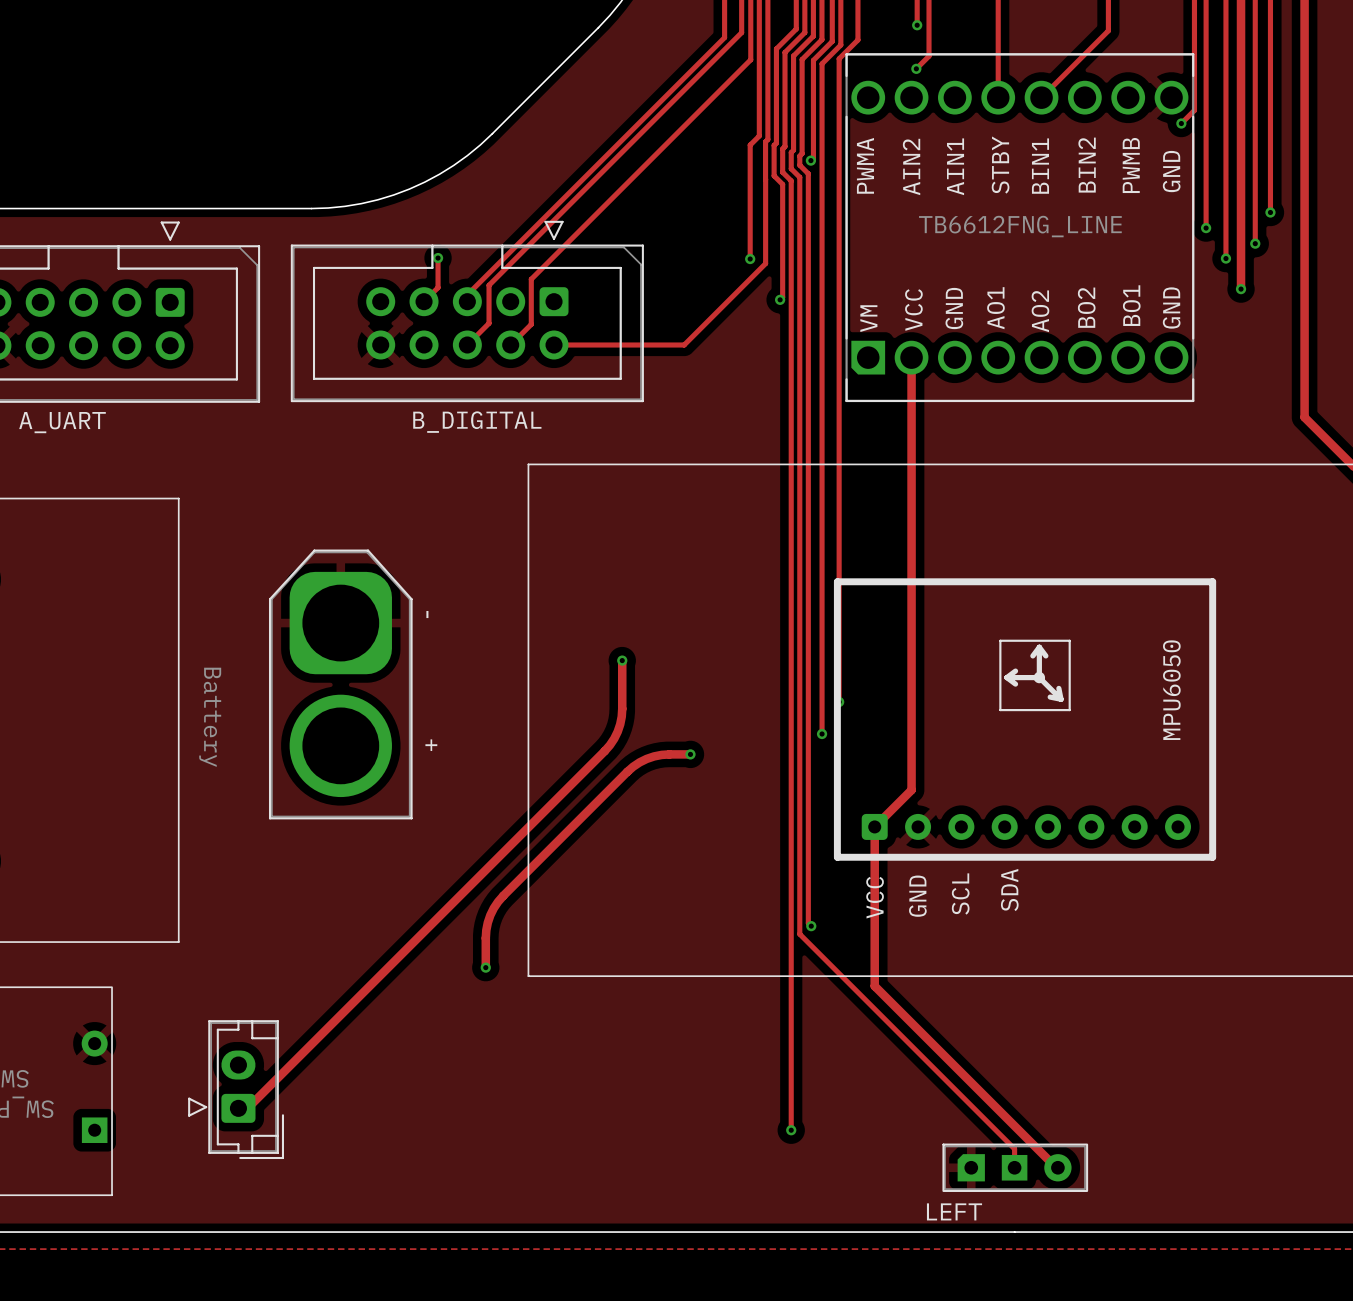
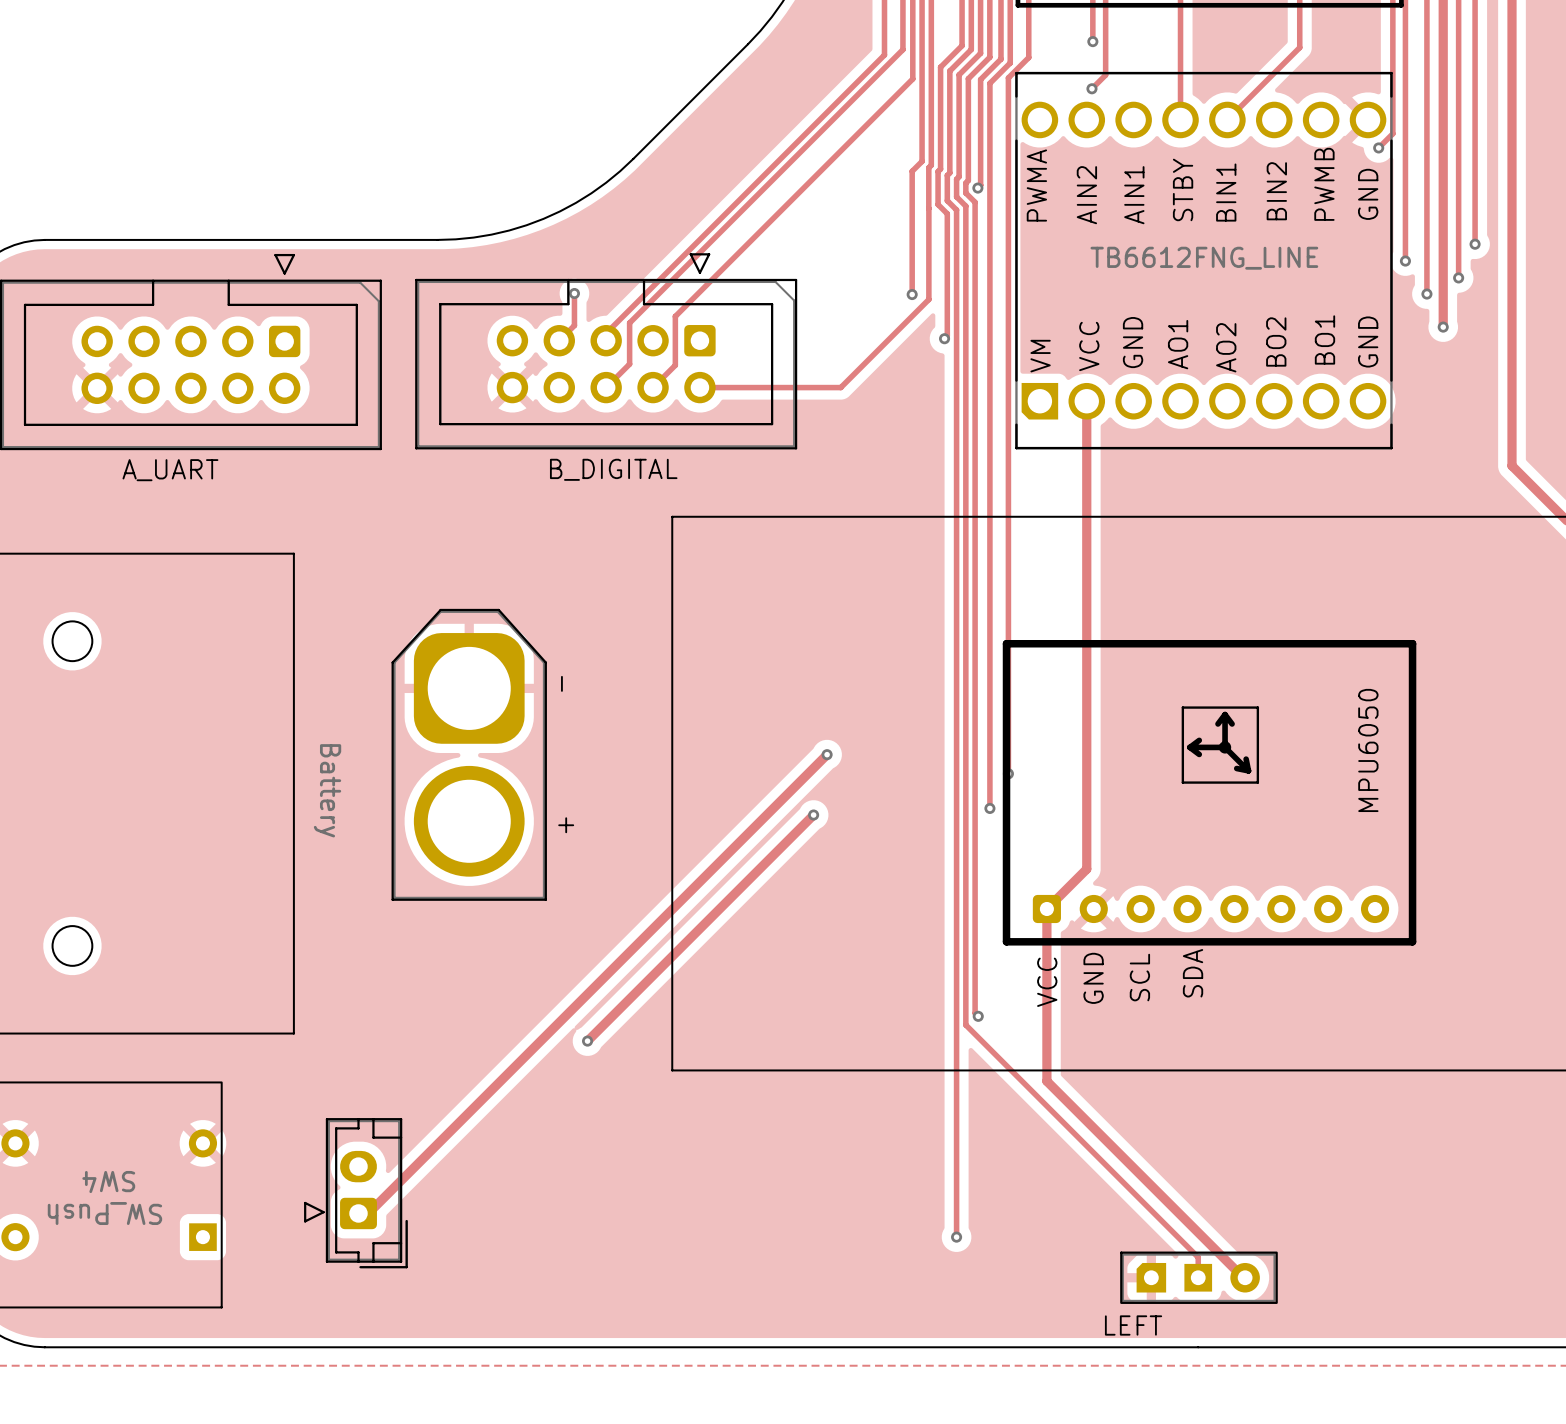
track: (622, 660) (621, 716) (614, 738) (604, 751) -> (827, 754) (754, 826)
via: (622, 660) -> none
via: none -> (827, 754)
track: (690, 754) (654, 756) (639, 762) (627, 771) -> (813, 815) (779, 849)
via position: (690, 754) -> (813, 815)
track: (503, 895) (493, 908) (487, 922) (485, 967) -> (645, 983) (587, 1041)
via position: (485, 967) -> (587, 1041)

